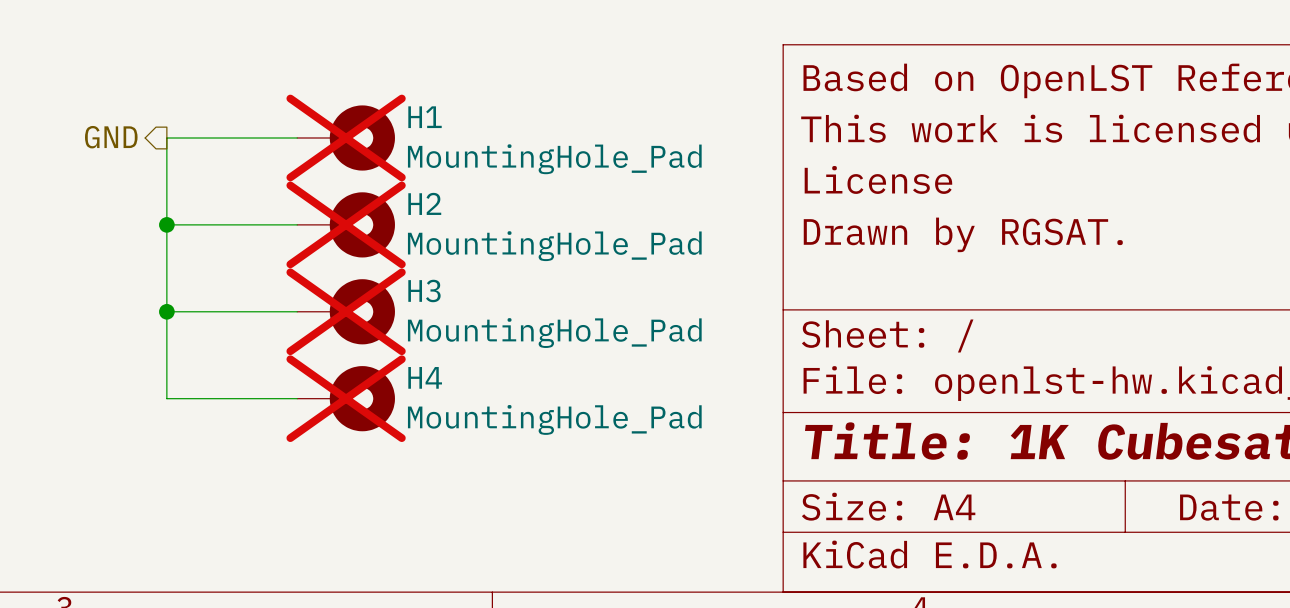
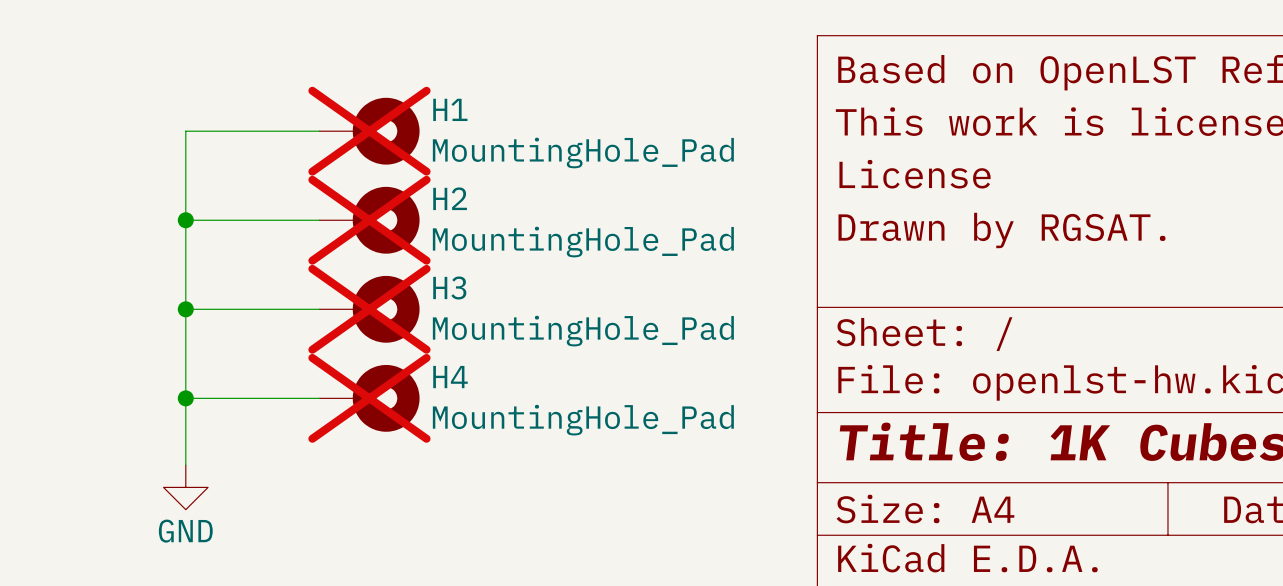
hierarchical label: GND (111, 137) -> none
wire: none -> (185, 398) (185, 465)
junction: none -> (185, 398)
power symbol: none -> GND (185, 487)

